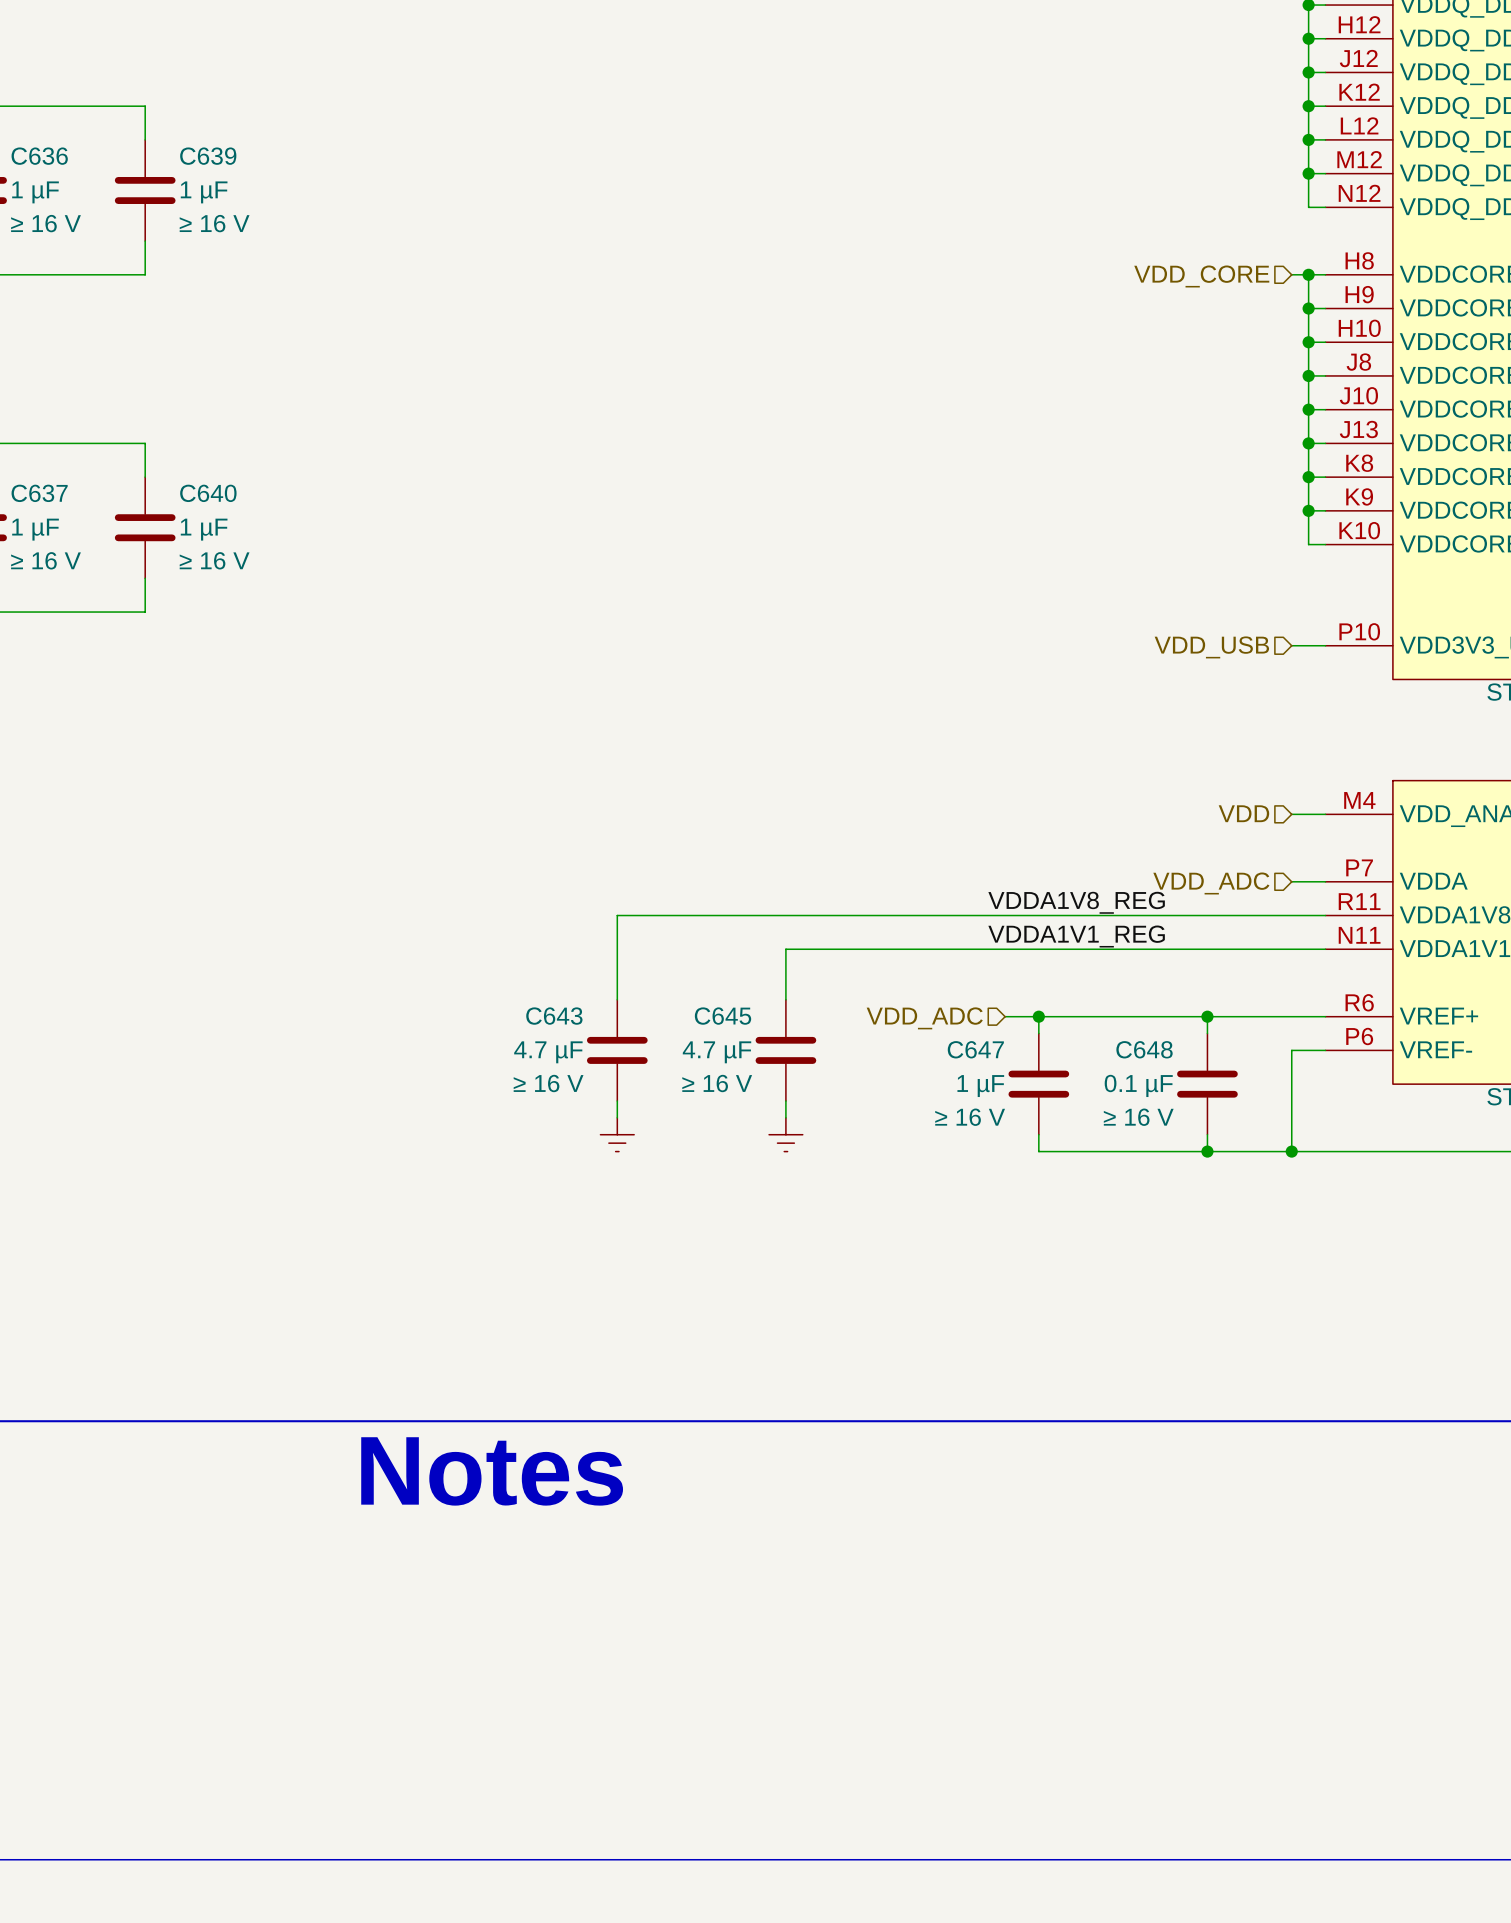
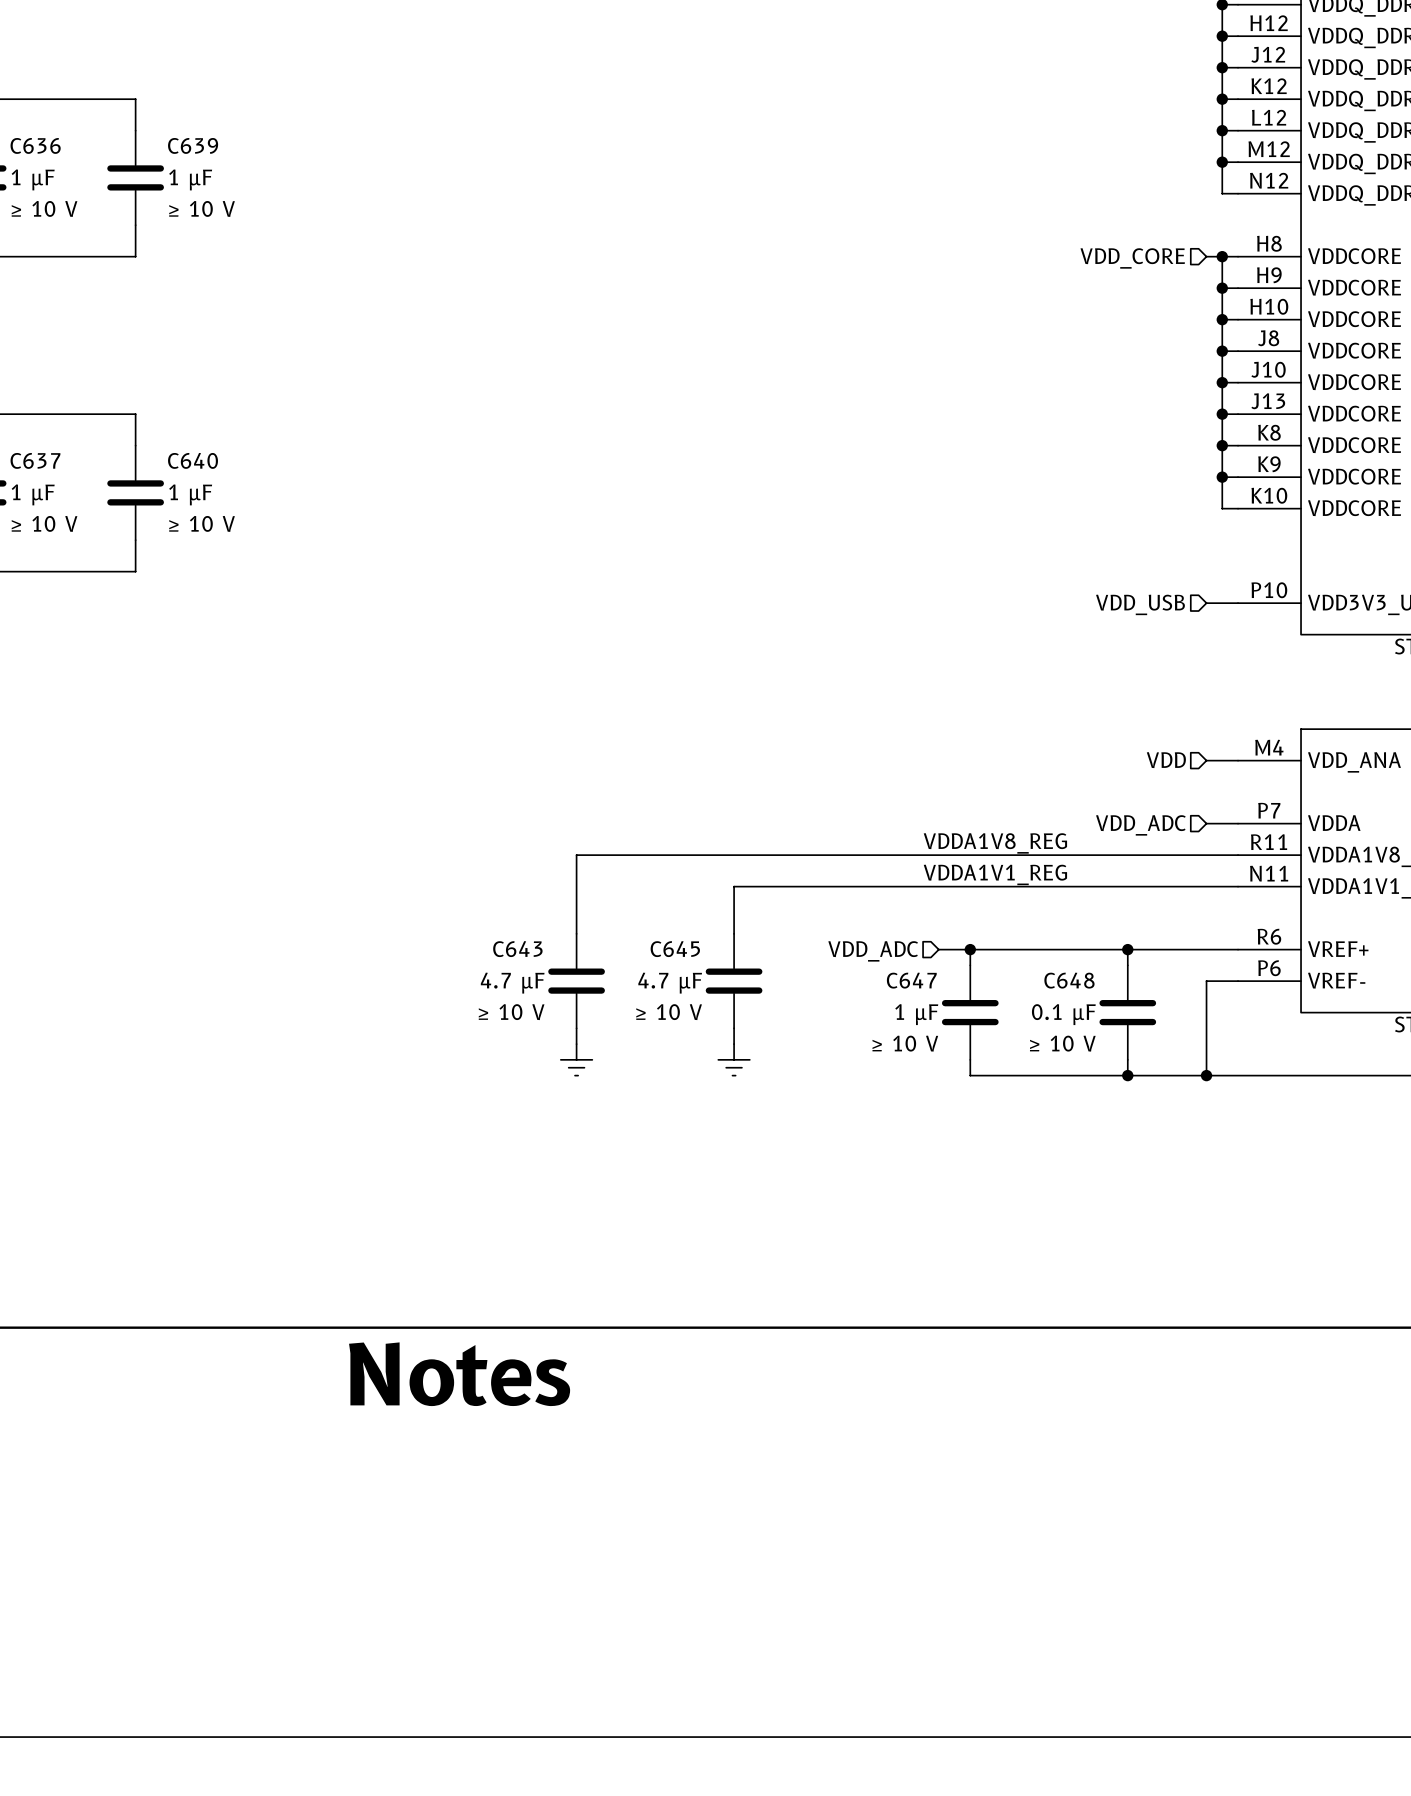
C636 text: ≥ 16 V (45, 223) -> ≥ 10 V (44, 208)
C639 text: ≥ 16 V (214, 223) -> ≥ 10 V (202, 208)
C637 text: ≥ 16 V (45, 560) -> ≥ 10 V (44, 523)
C640 text: ≥ 16 V (214, 560) -> ≥ 10 V (202, 523)
C643 text: ≥ 16 V (548, 1083) -> ≥ 10 V (511, 1012)
C645 text: ≥ 16 V (717, 1083) -> ≥ 10 V (669, 1012)
C647 text: ≥ 16 V (970, 1117) -> ≥ 10 V (905, 1043)
C648 text: ≥ 16 V (1138, 1117) -> ≥ 10 V (1062, 1043)

